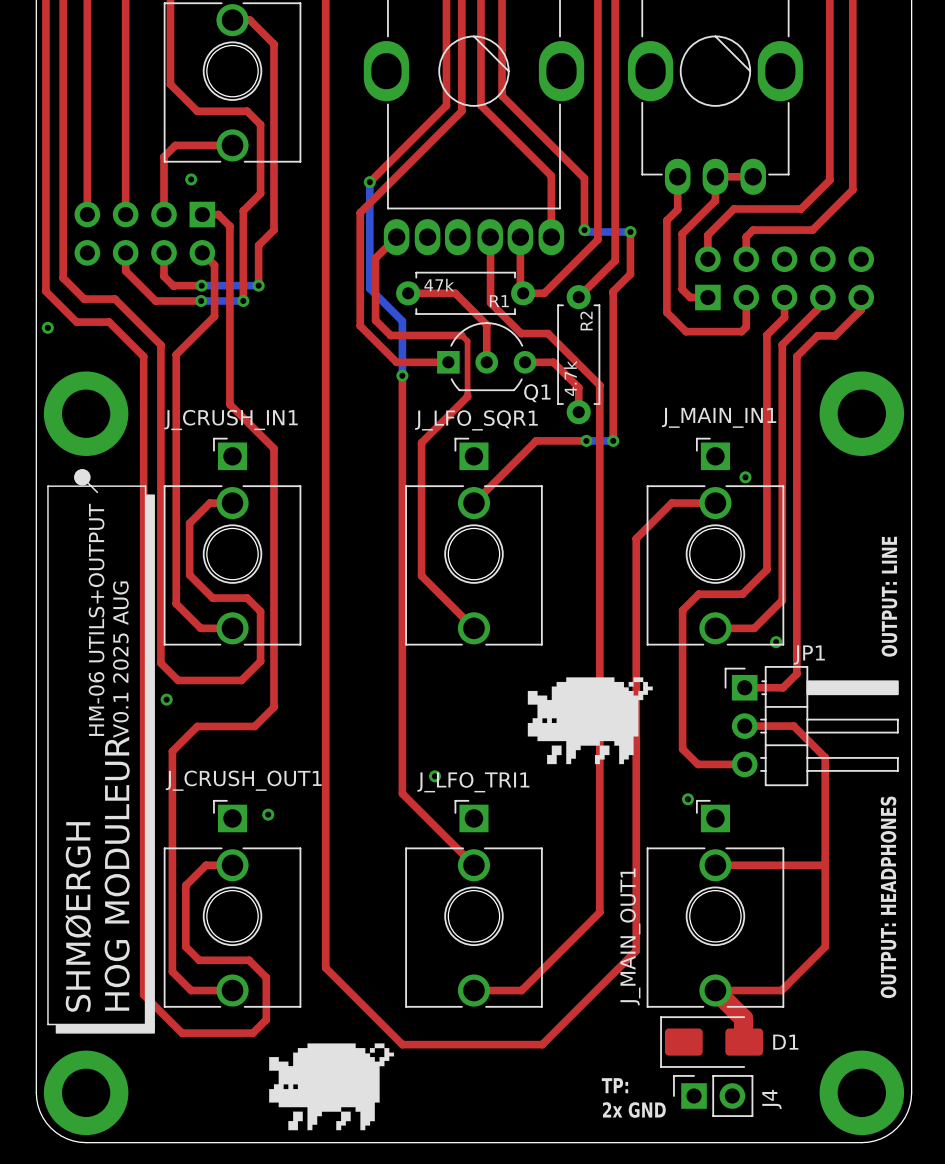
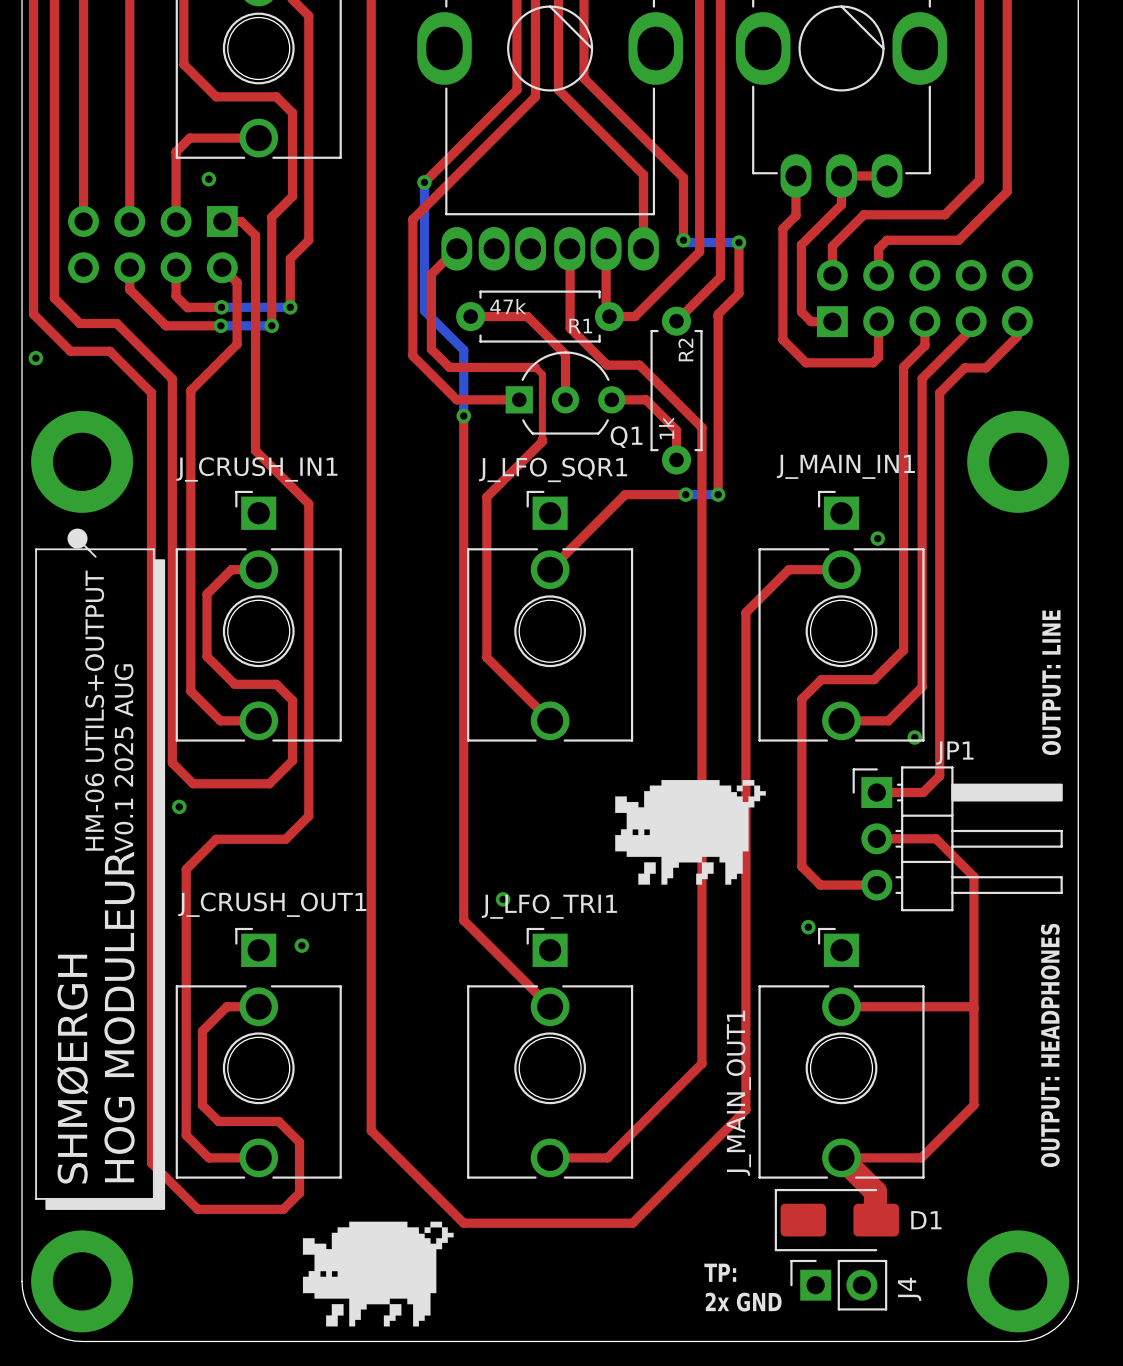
R2 value: 4.7k (570, 378) -> 1k (666, 428)

